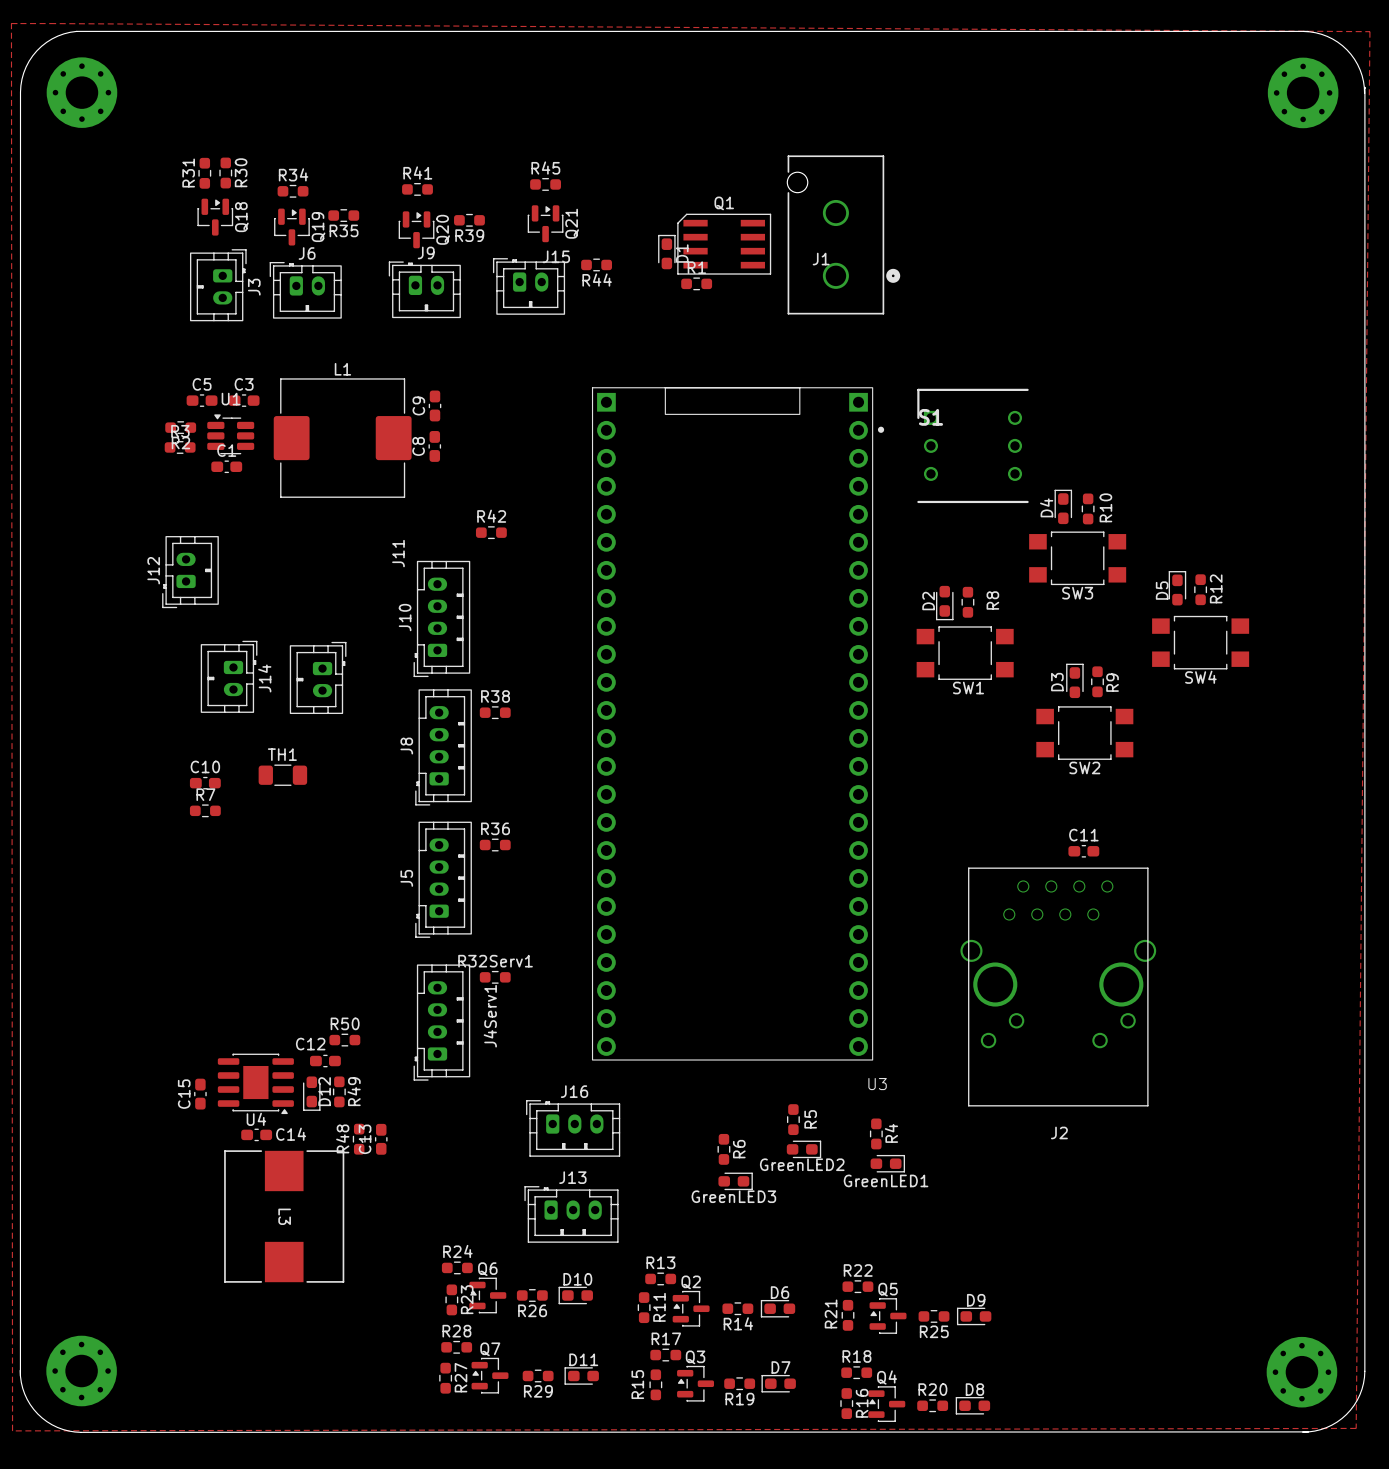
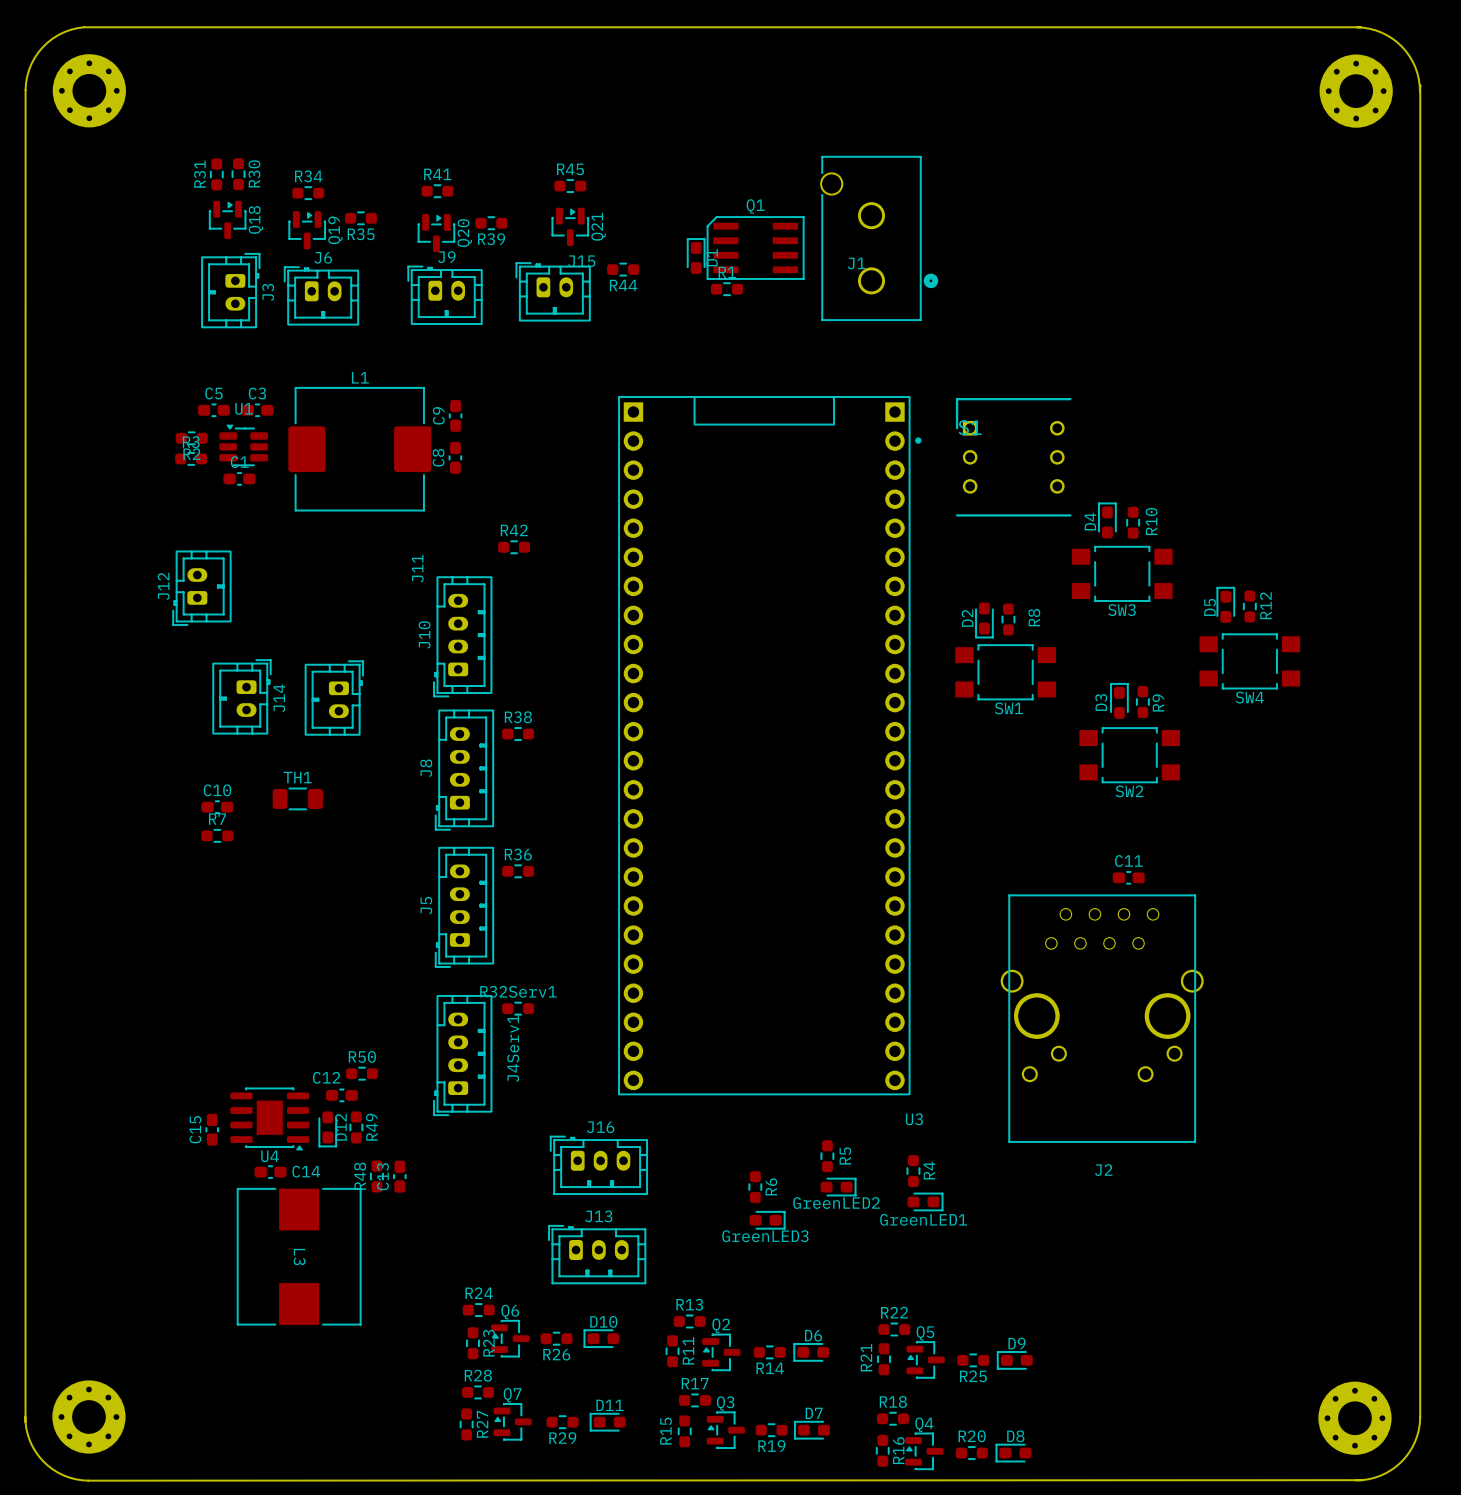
zone outline: (11, 23) (1369, 31) (1356, 1428) (12, 1430) (11, 23) -> none

